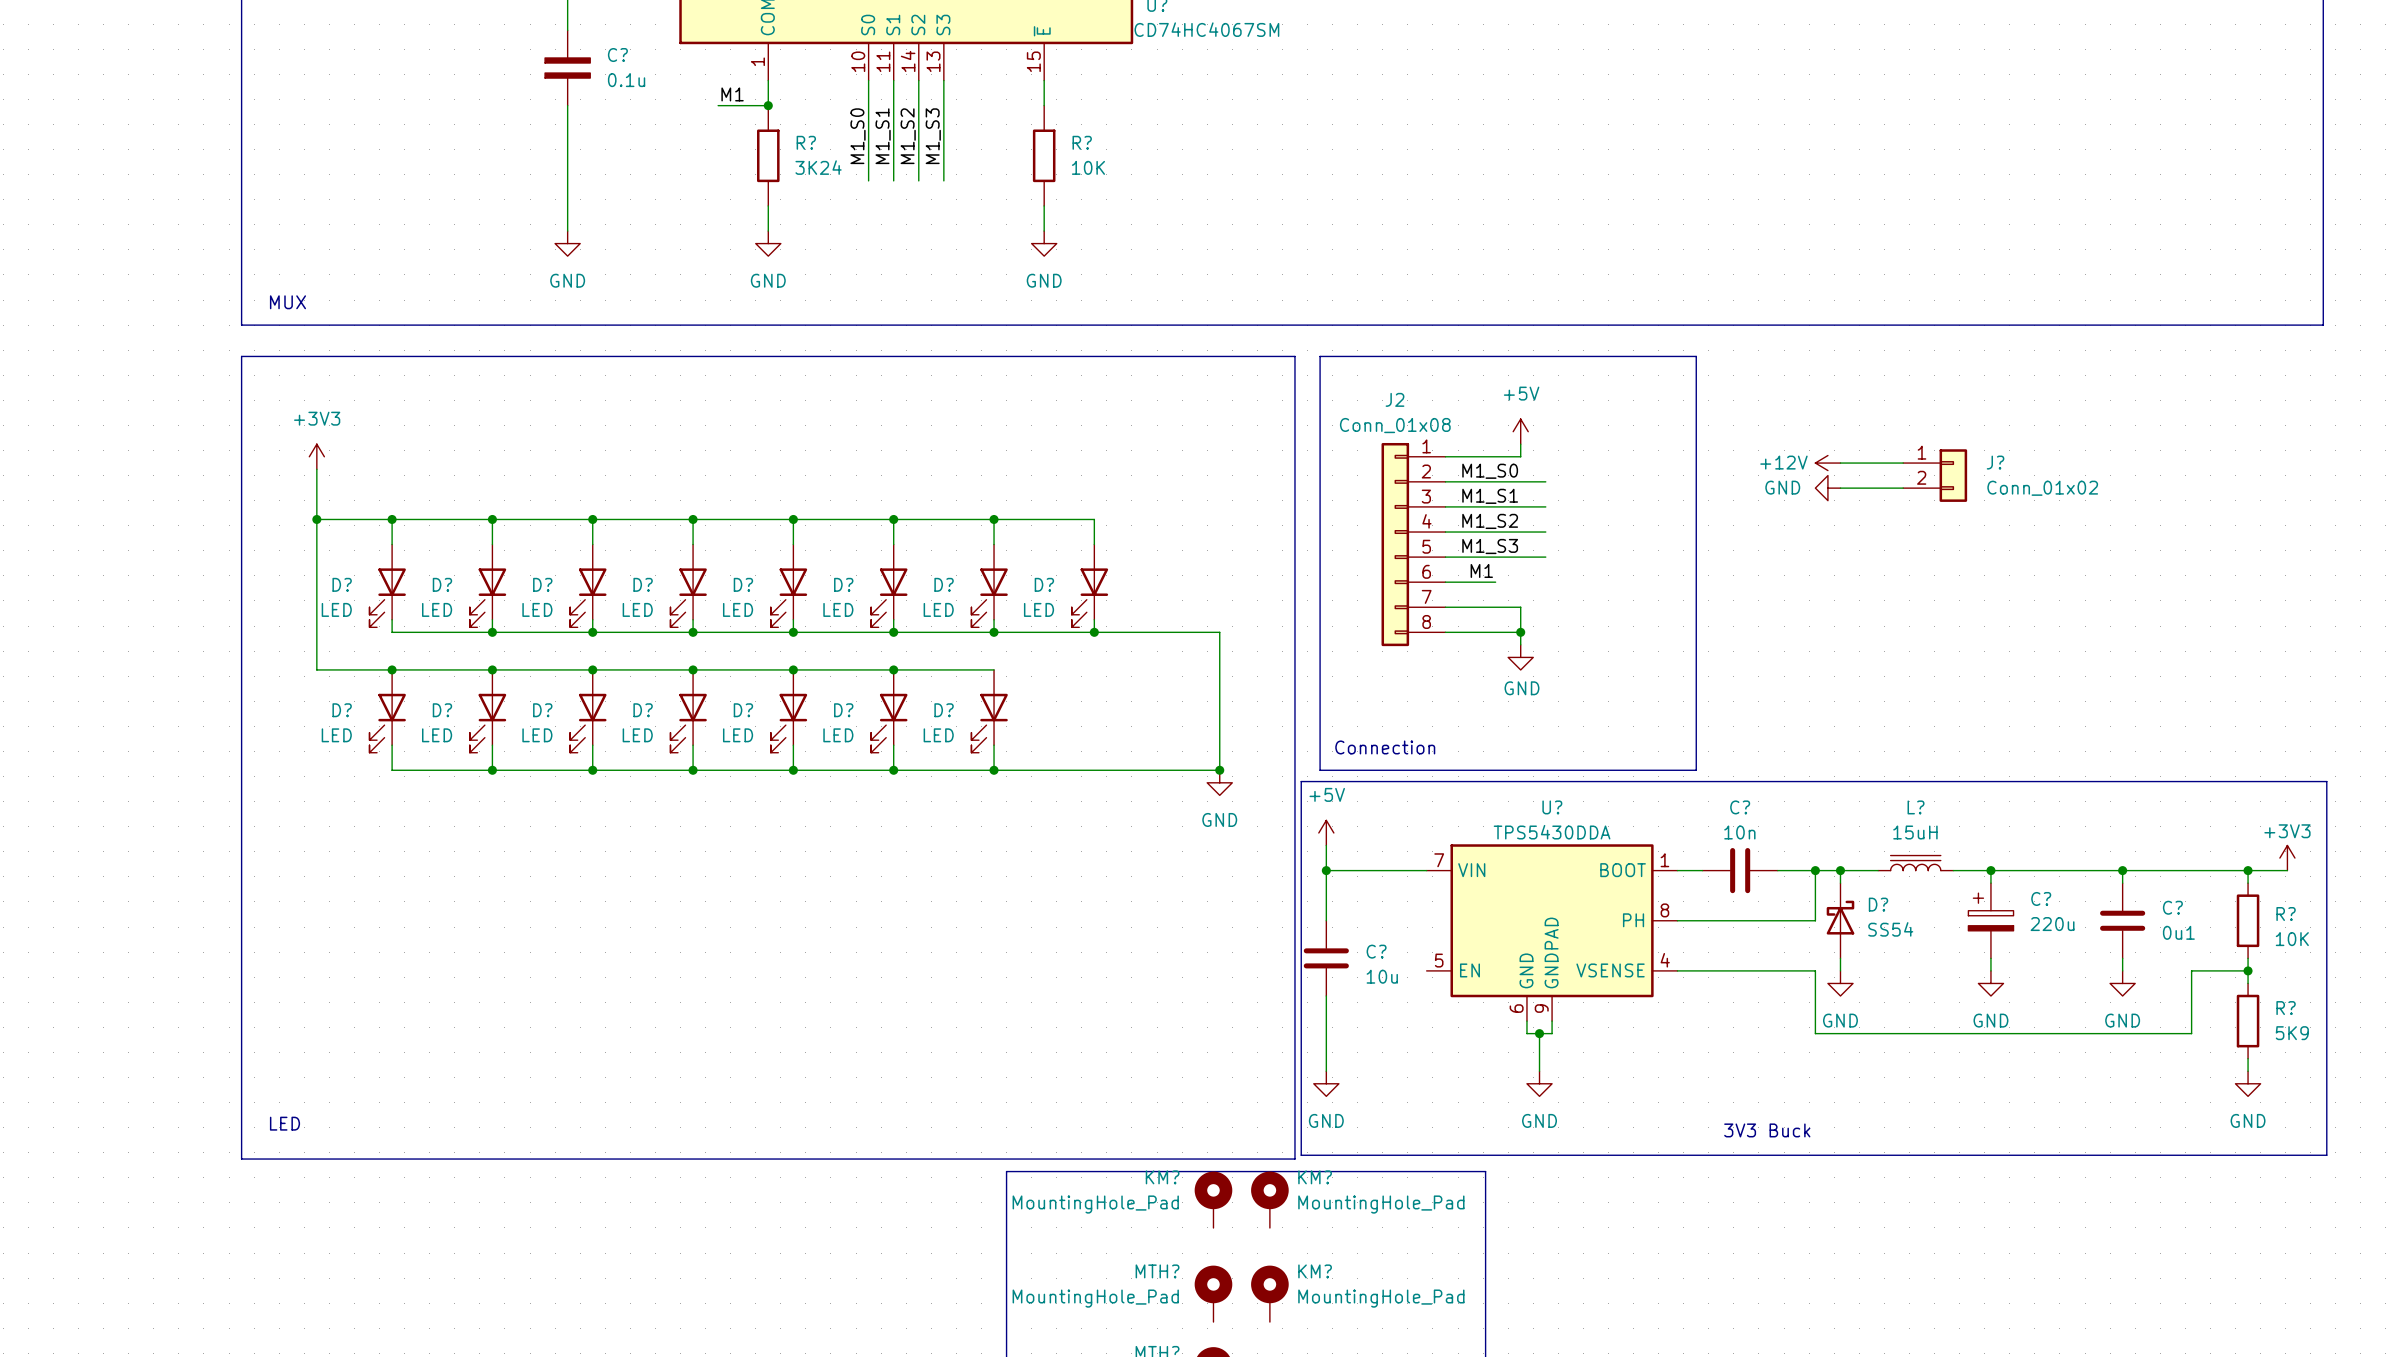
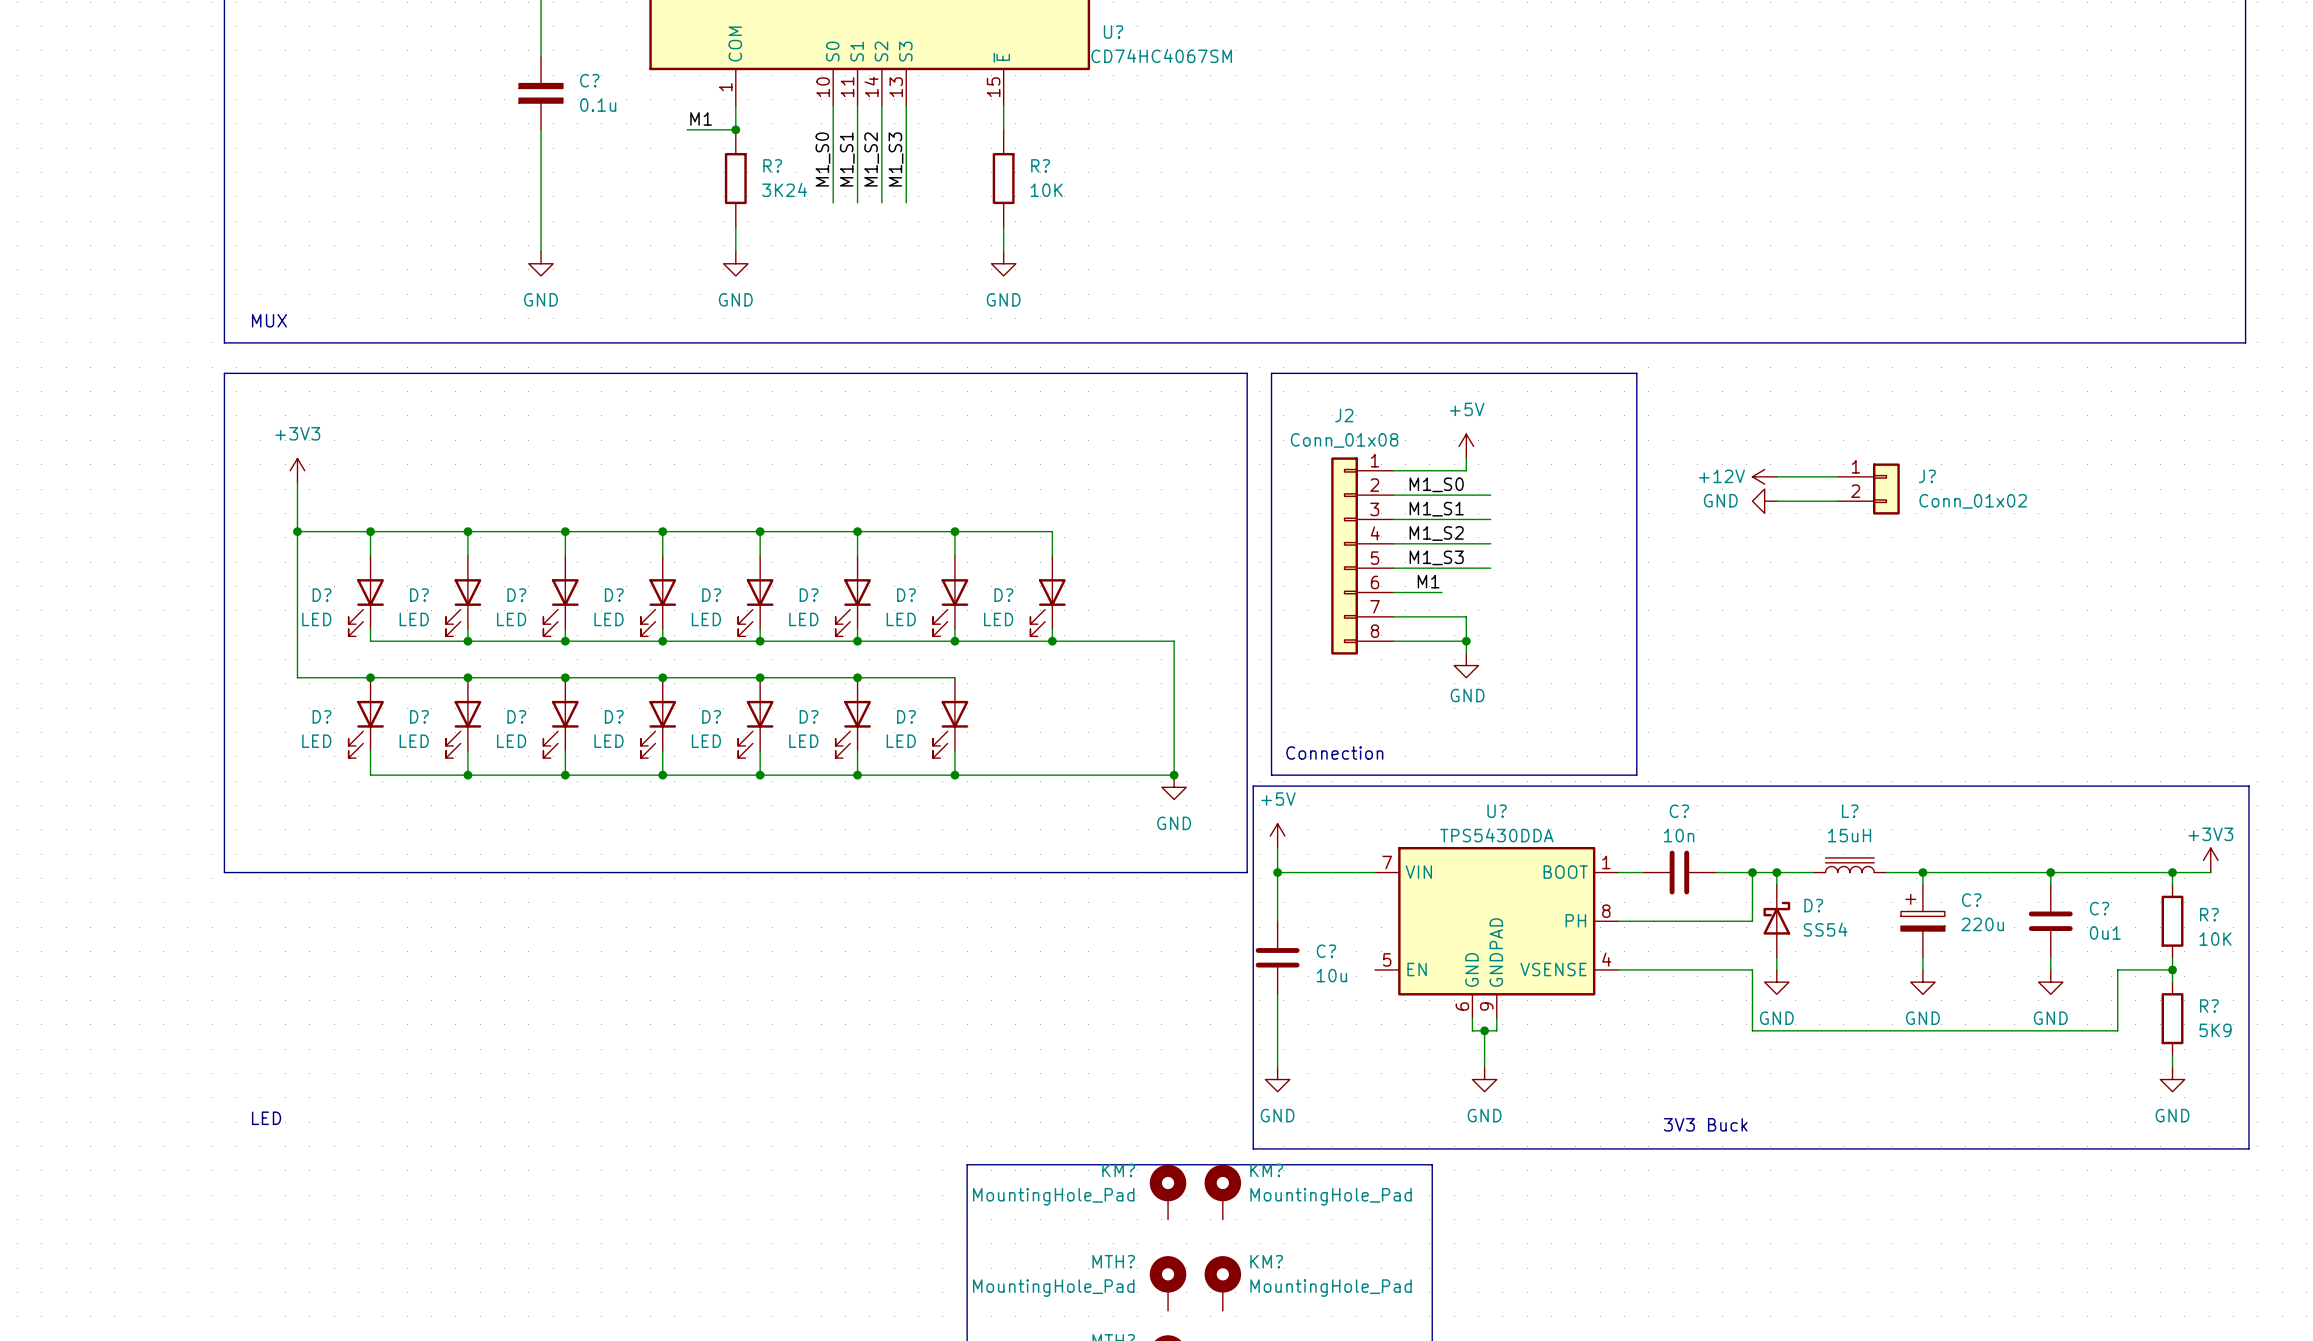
line: (241, 870) (241, 1159) (1294, 1159) (1294, 870) -> (224, 872) (1247, 872)

